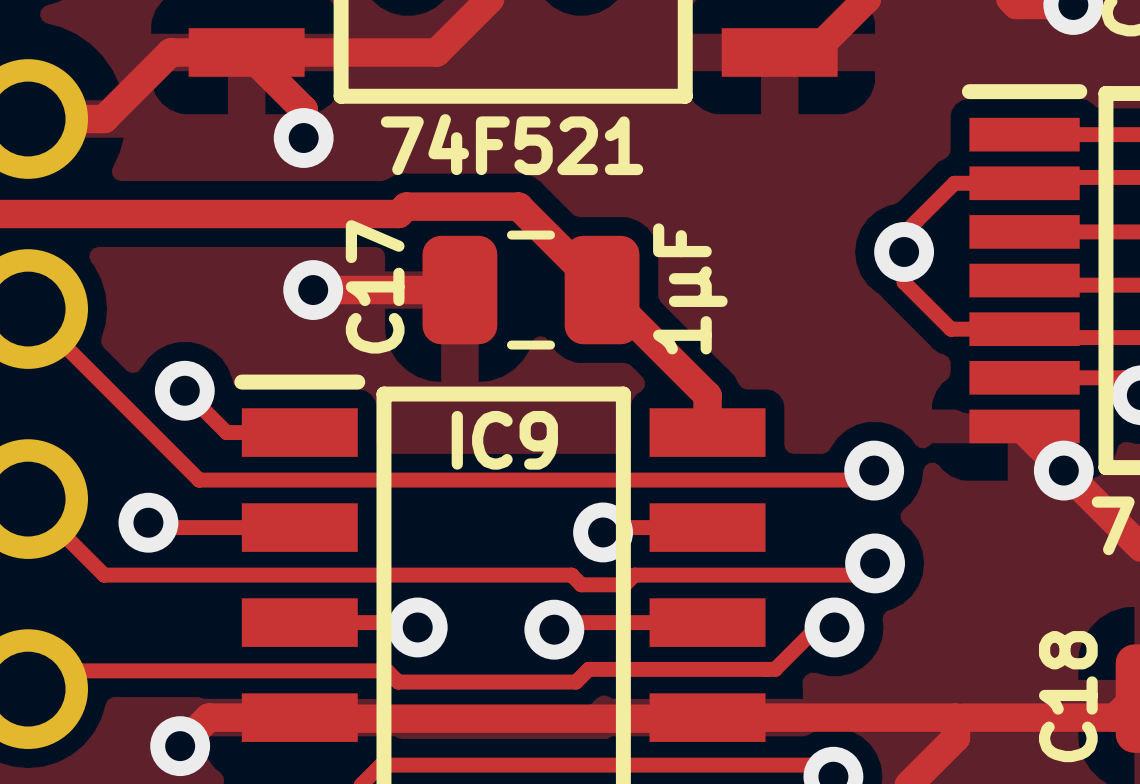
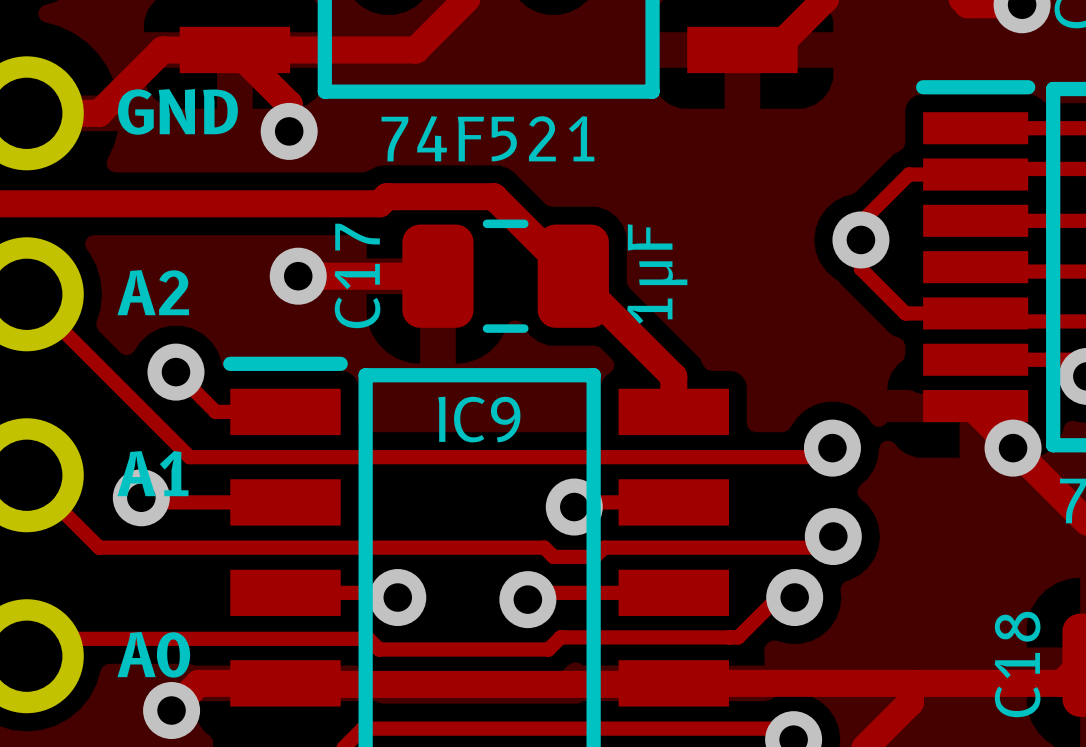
text: none -> GND (177, 111)
text: none -> A2 (153, 292)
text: none -> A1 (152, 473)
text: none -> A0 (153, 654)

